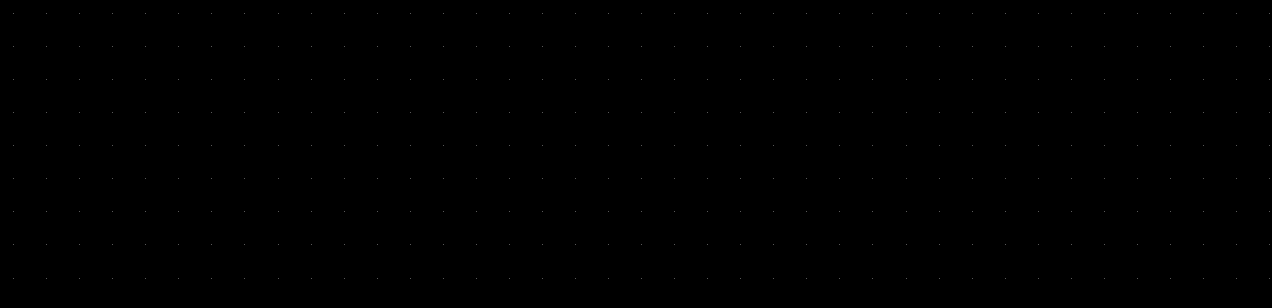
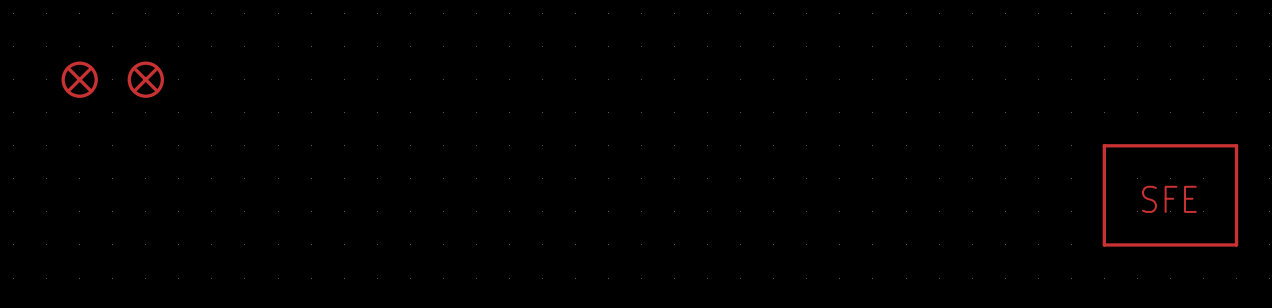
part: none -> (79, 79)
part: none -> (145, 79)
part: none -> (1170, 195)

